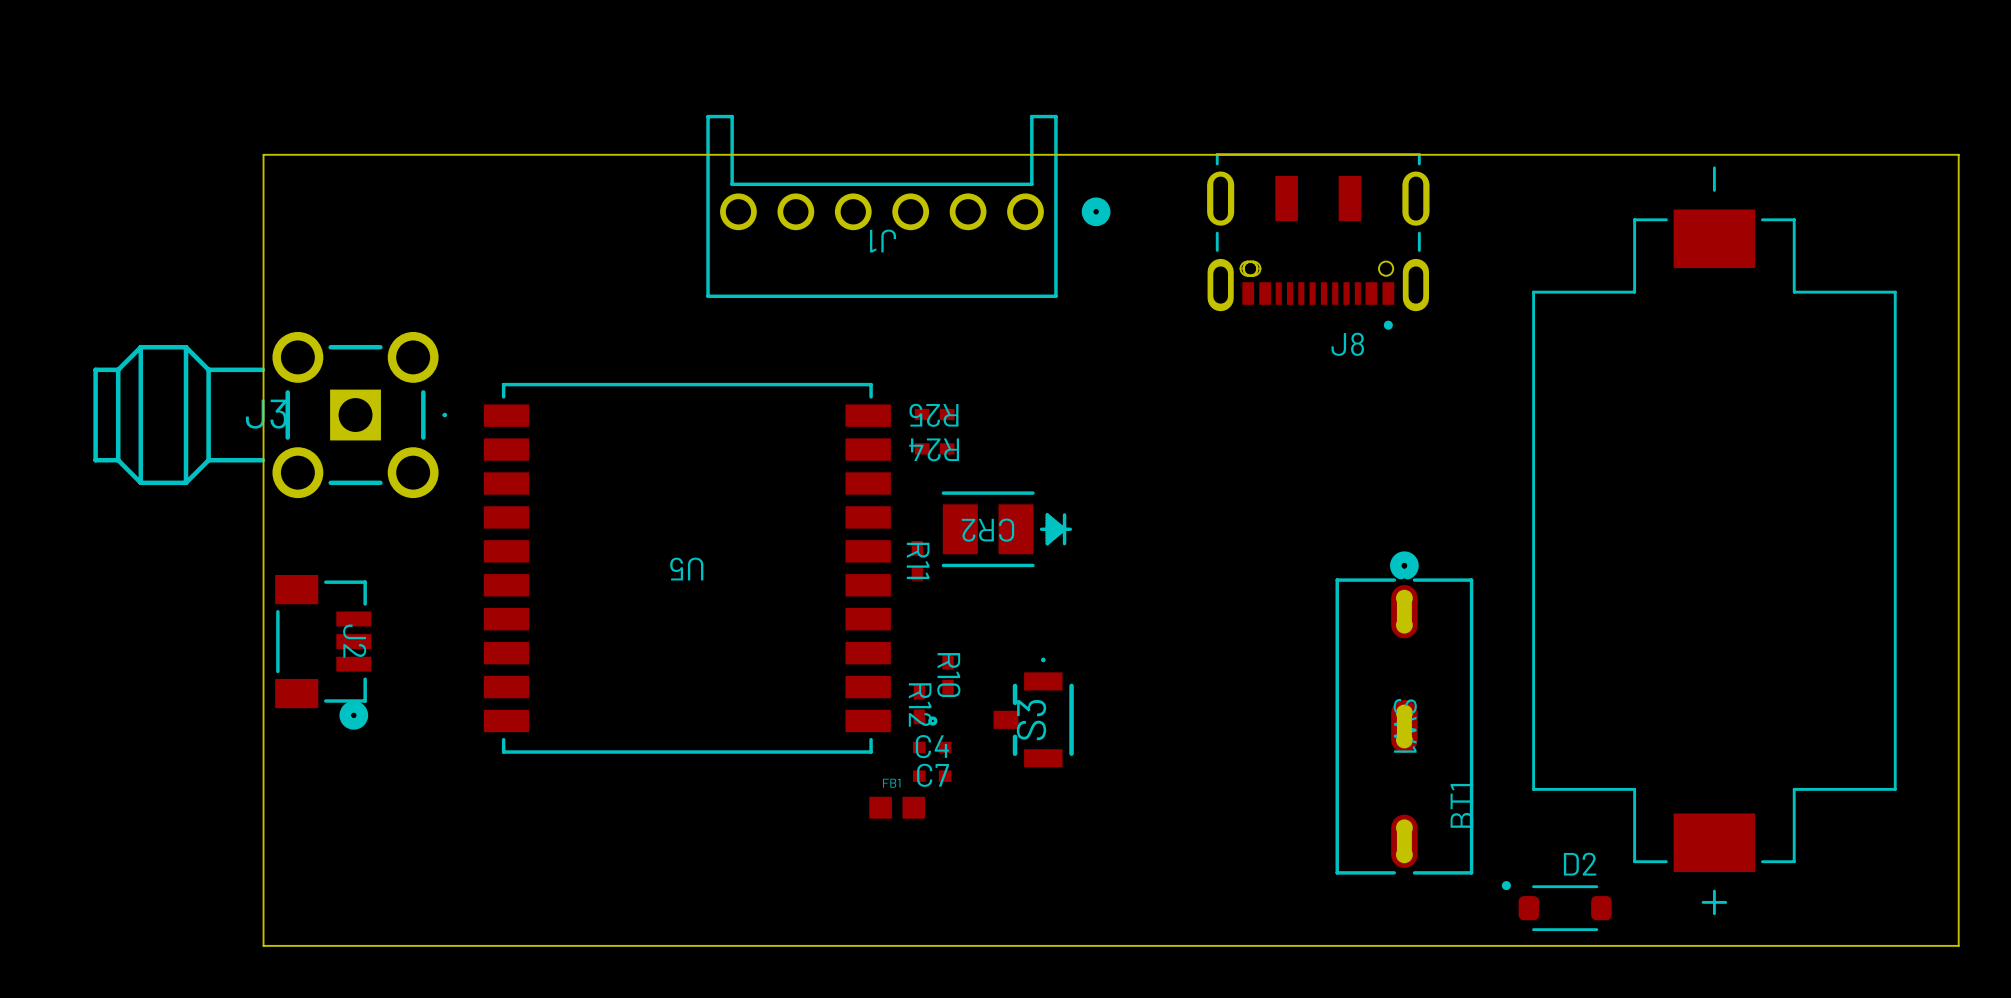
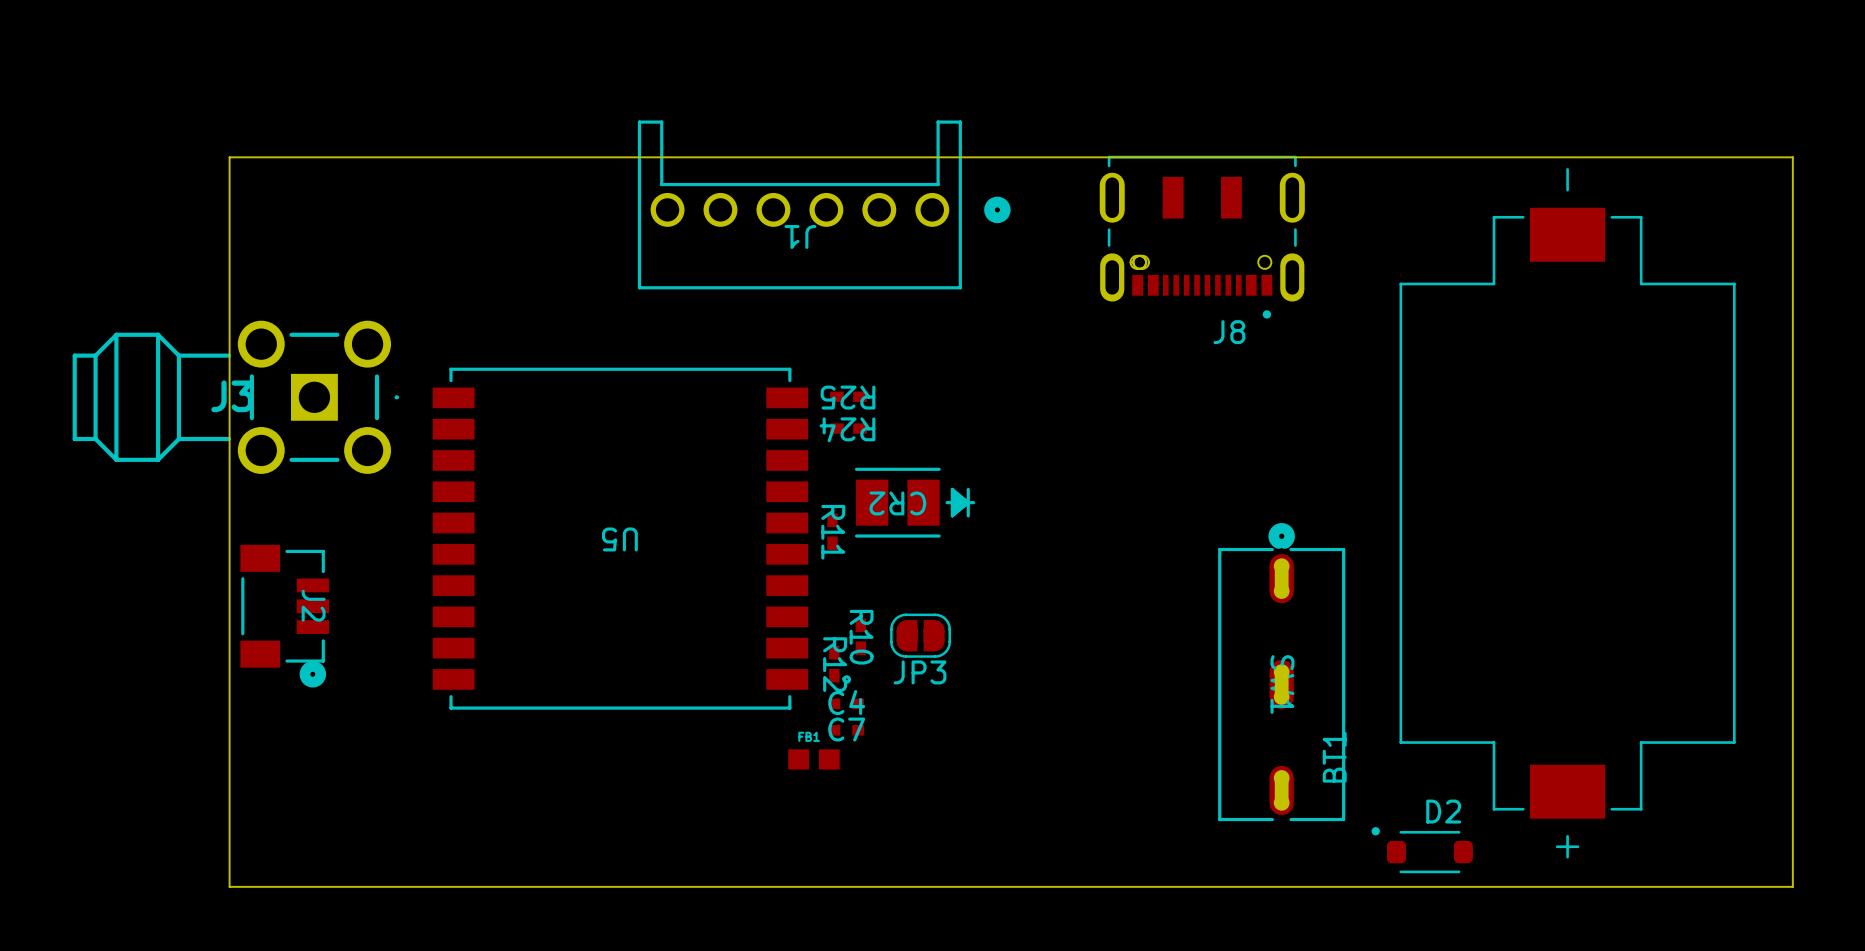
JP3: none -> (920, 635)
S3: (1033, 712) -> none

